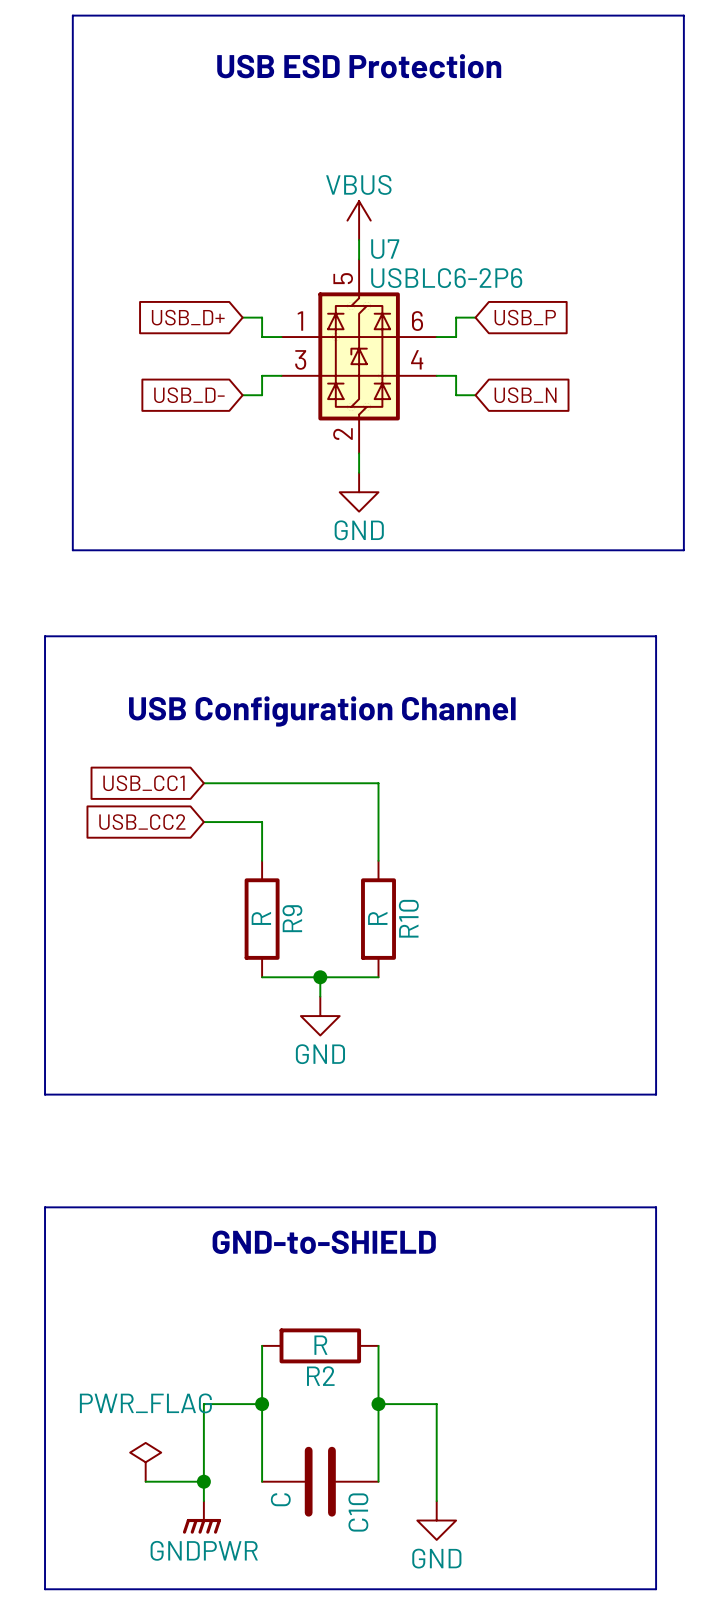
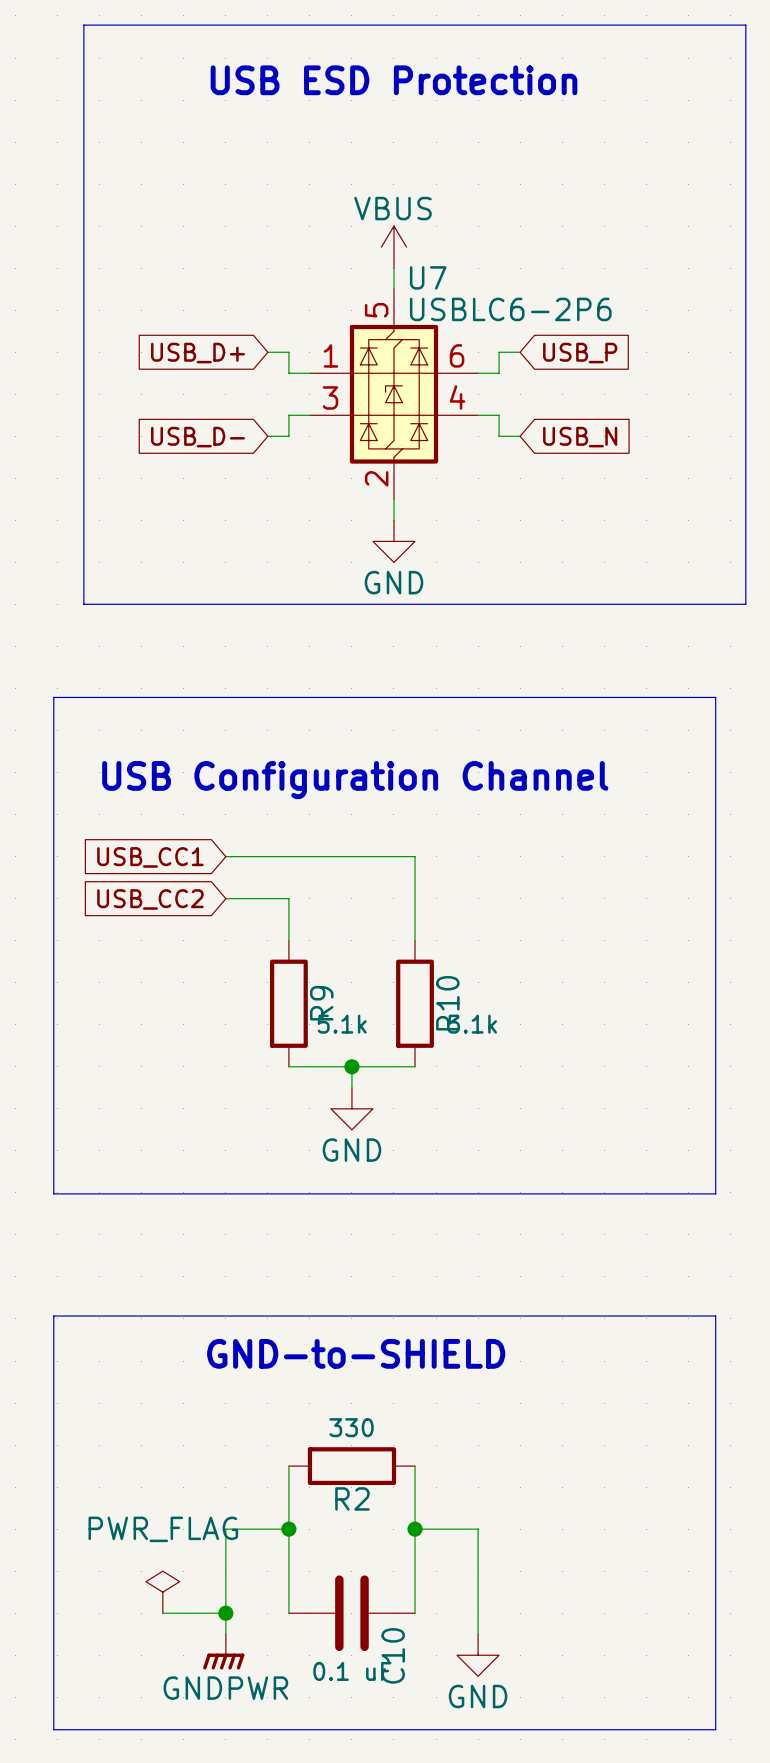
R9 value: R (261, 918) -> 5.1k (342, 1024)
R10 value: R (377, 918) -> 5.1k (472, 1024)
R2 value: R (320, 1345) -> 330 (351, 1427)
C10 value: C (280, 1499) -> 0.1 uF (352, 1671)

